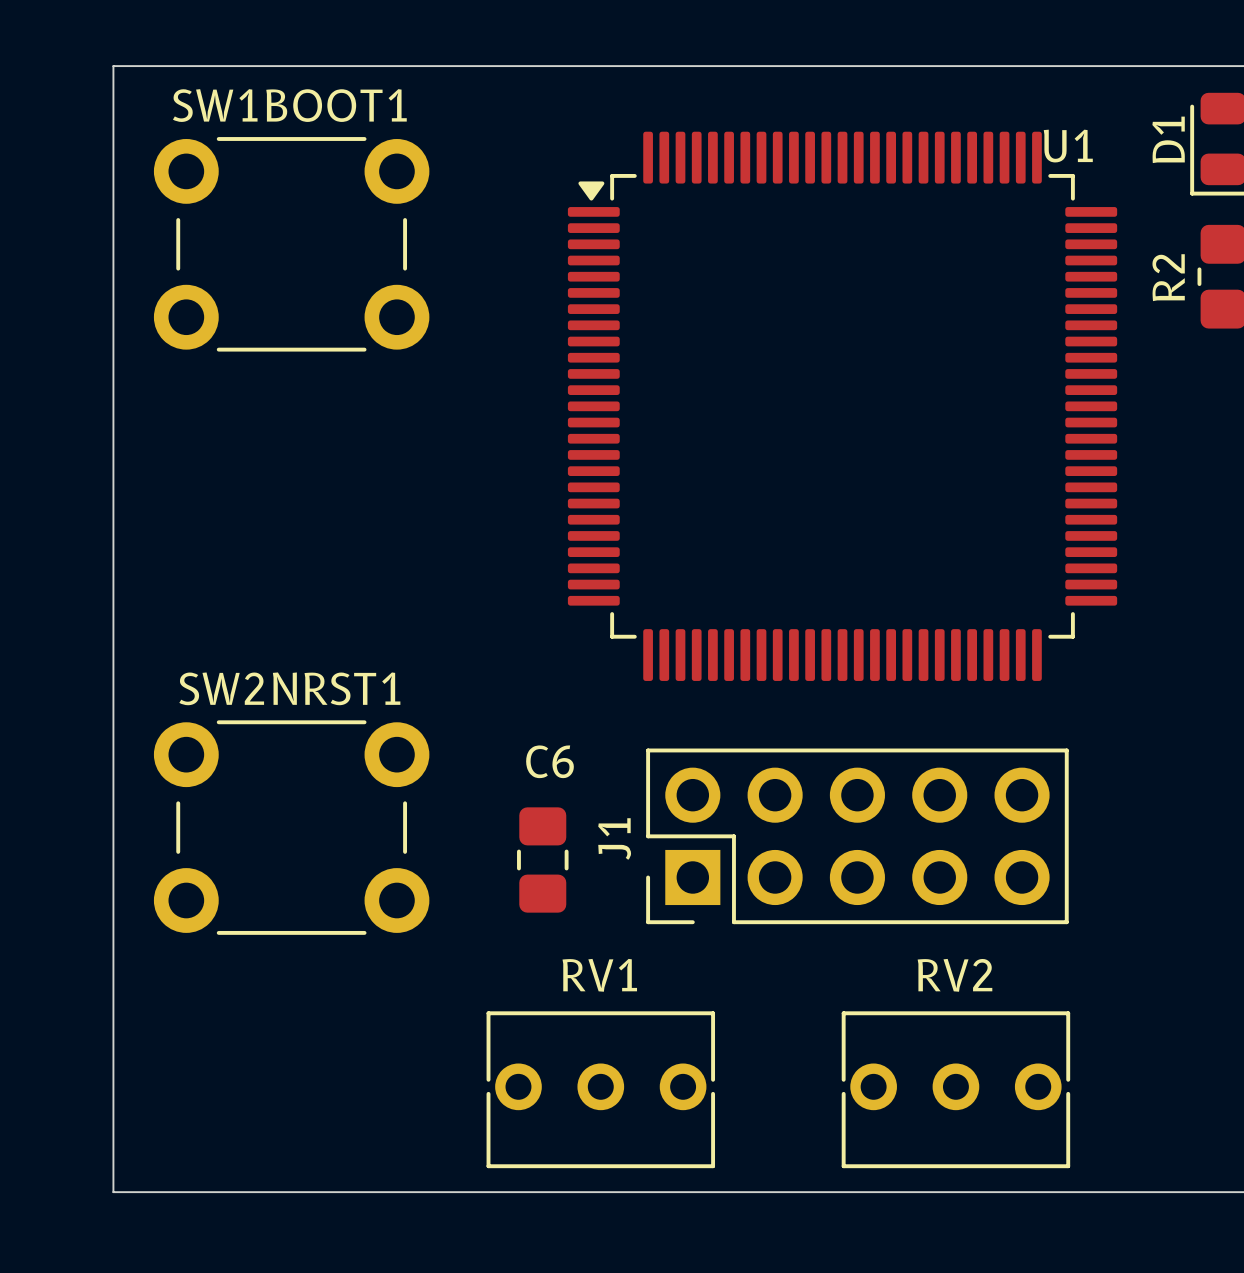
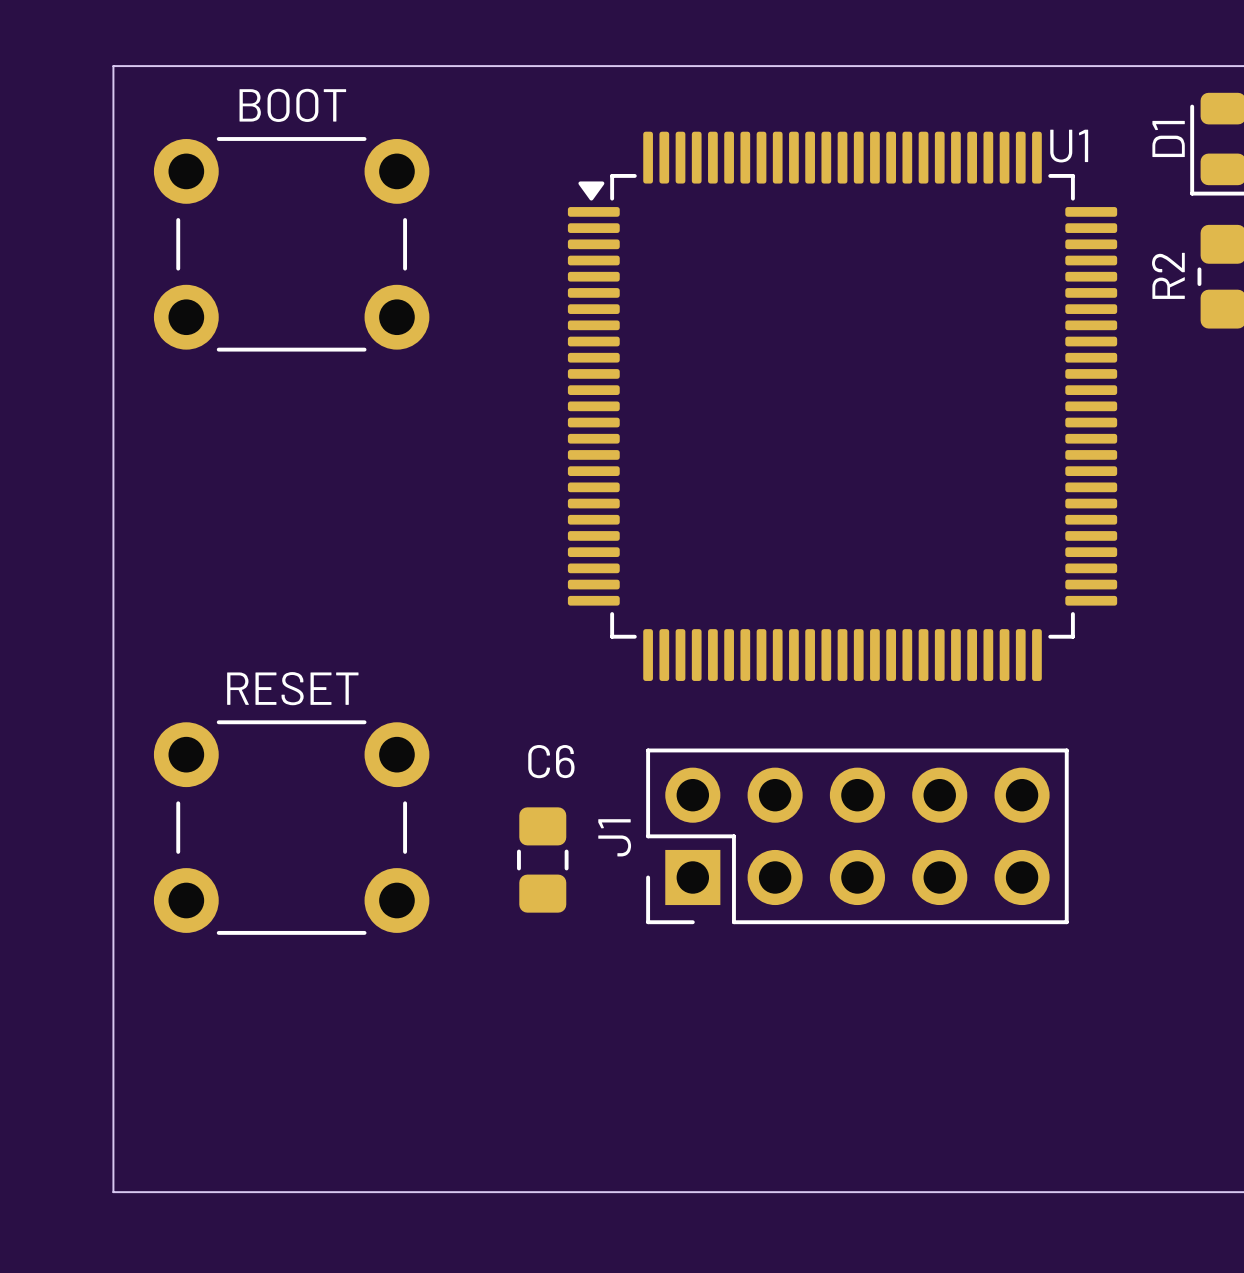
SW1BOOT1 name: SW1BOOT1 (289, 105) -> BOOT (292, 105)
SW2NRST1 name: SW2NRST1 (289, 688) -> RESET (292, 688)
RV1: (600, 1089) -> none
RV2: (955, 1089) -> none

